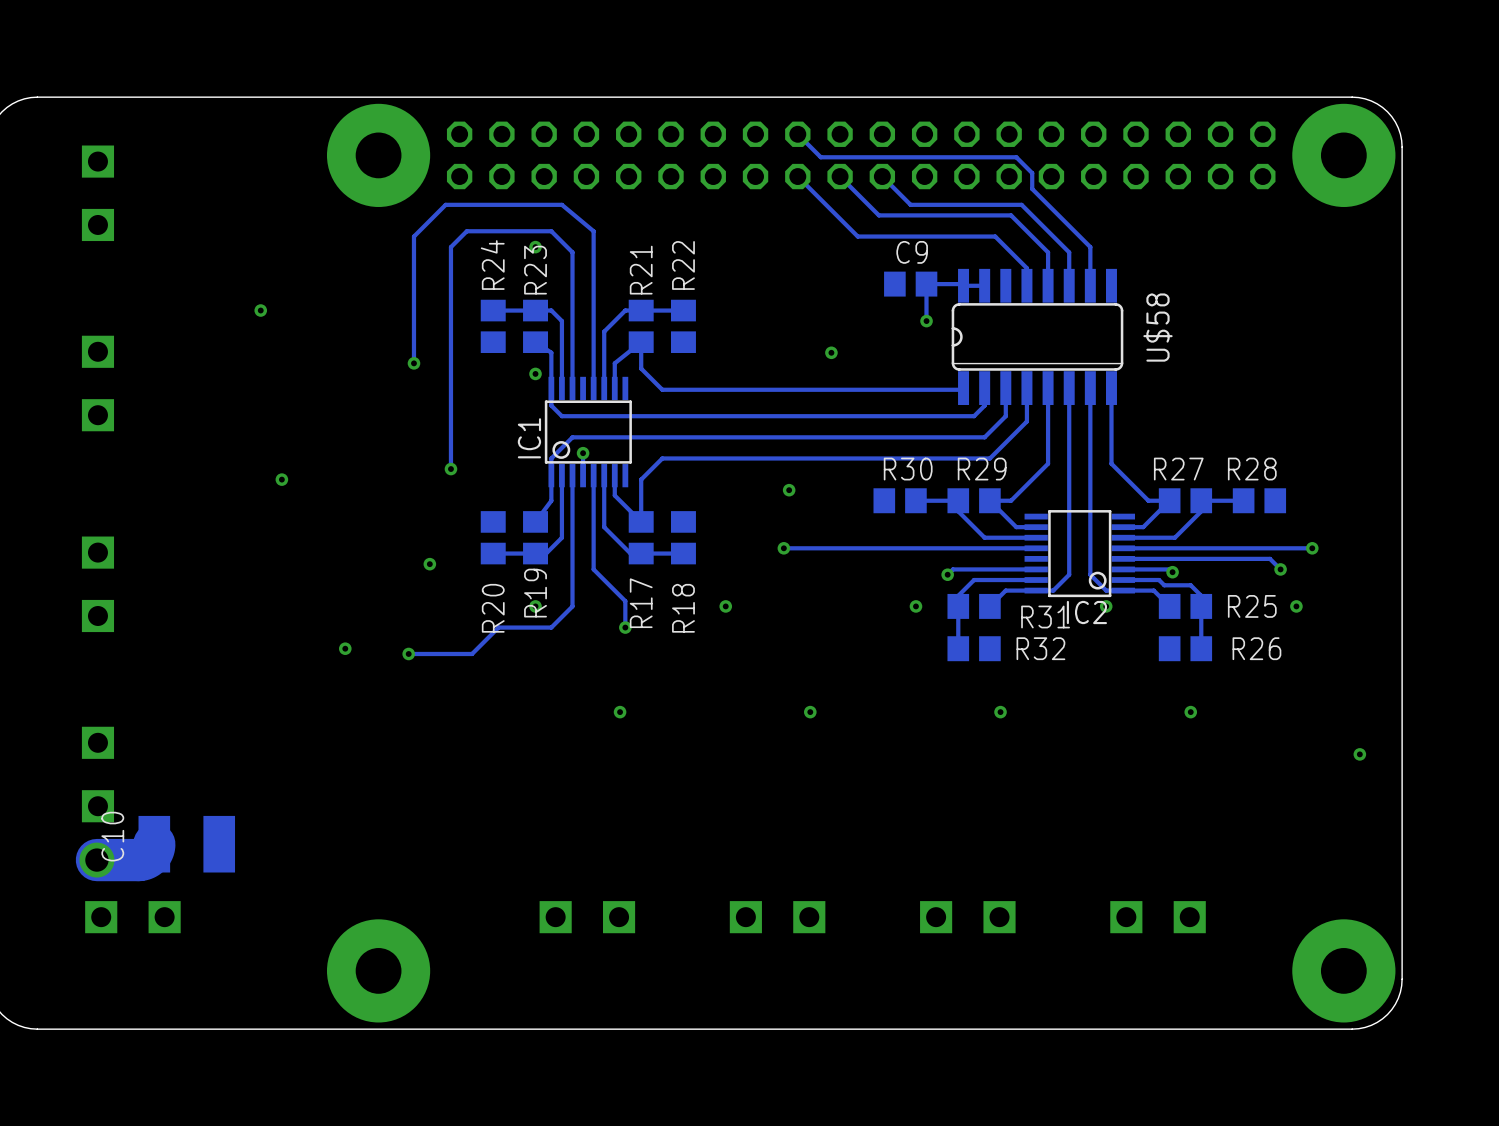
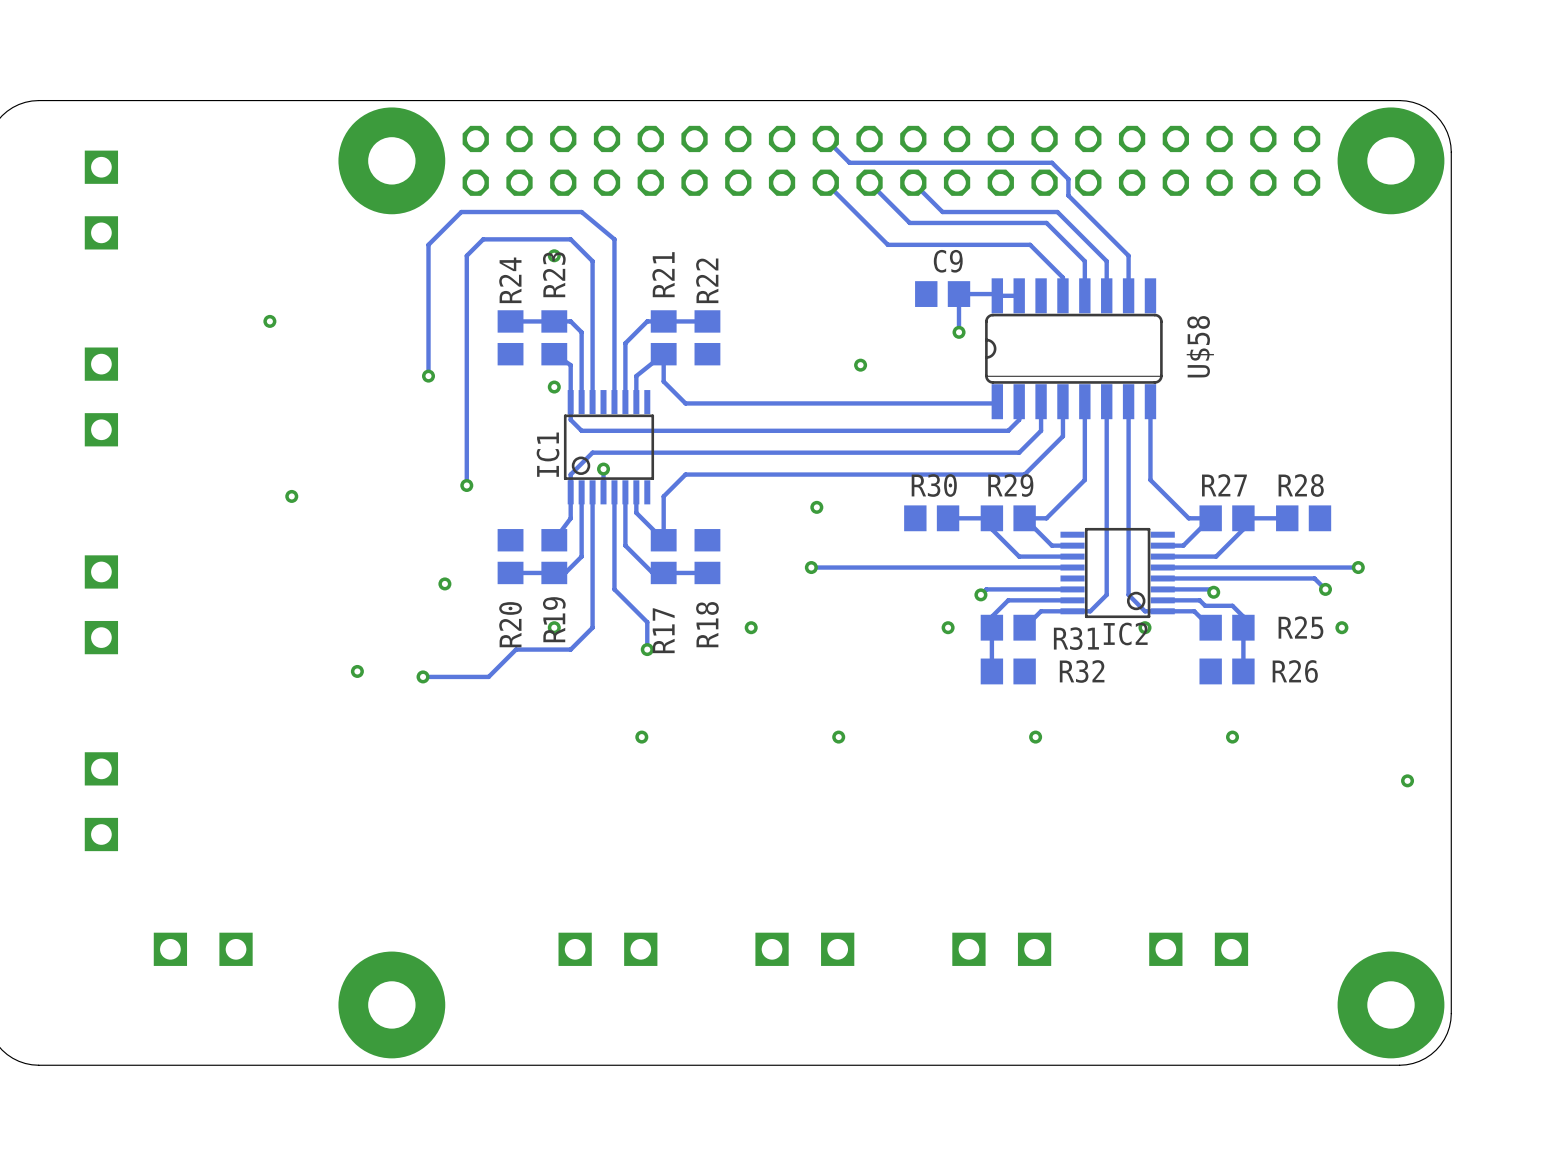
track: (154, 844) (151, 853) (142, 859) (96, 860) -> none
C10: (186, 844) -> none
via: (96, 860) -> none
part position: (132, 917) -> (203, 949)

